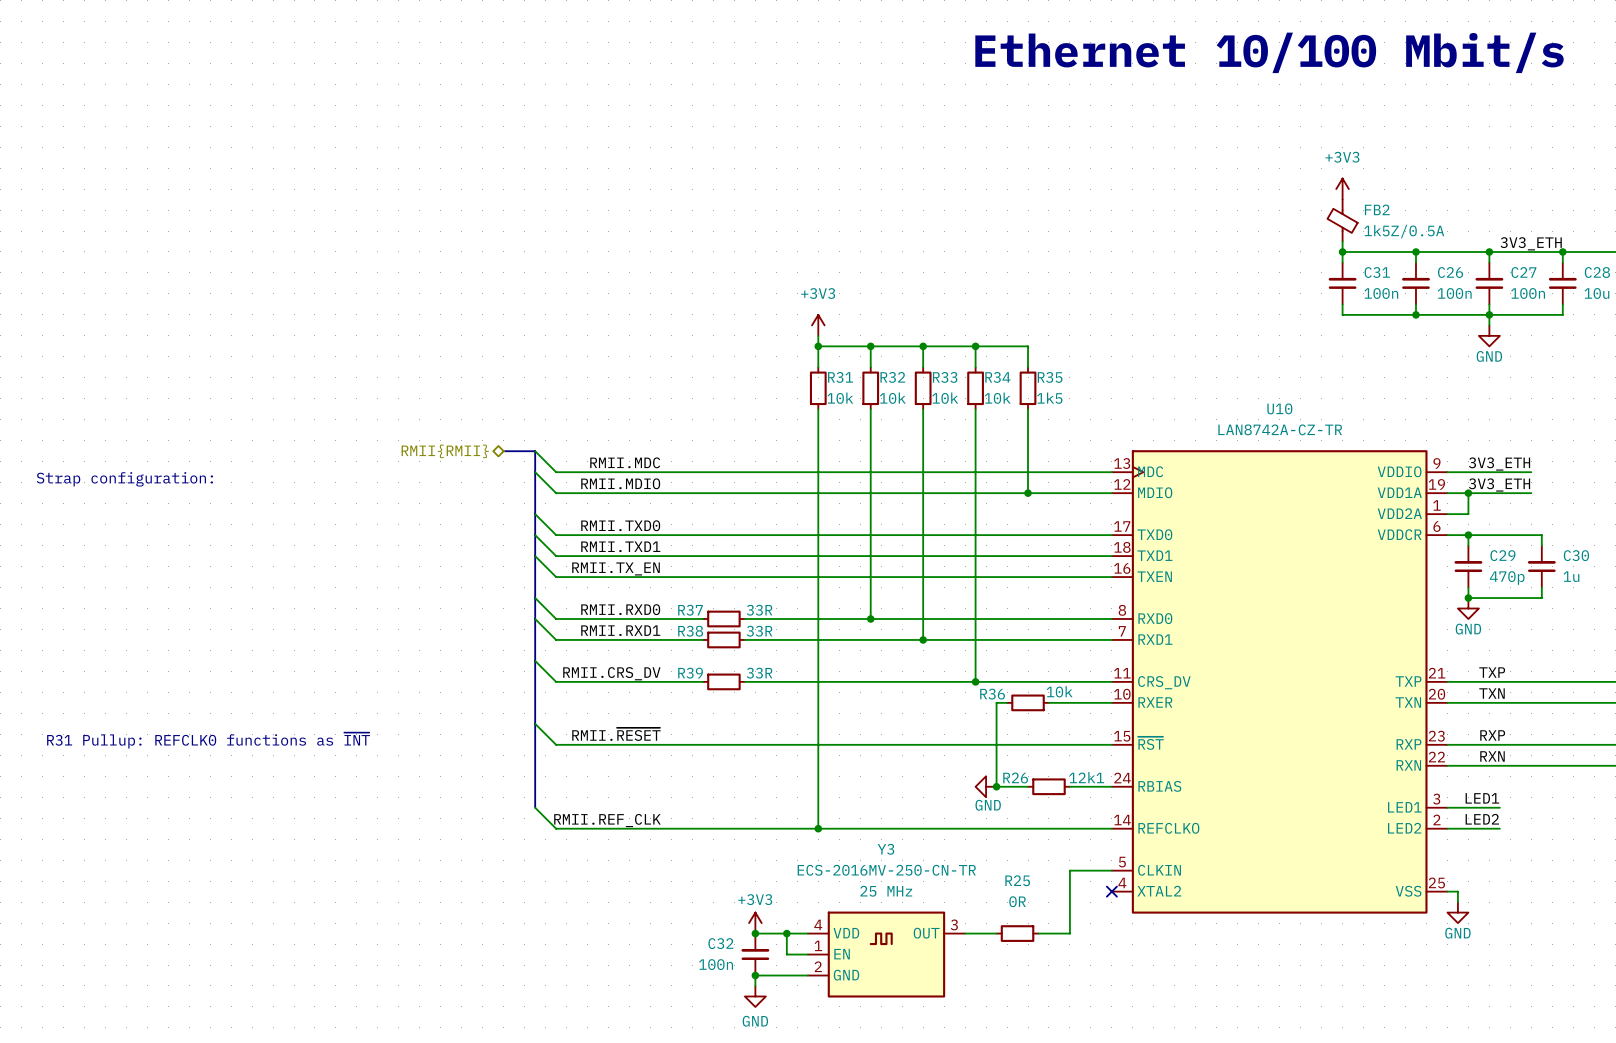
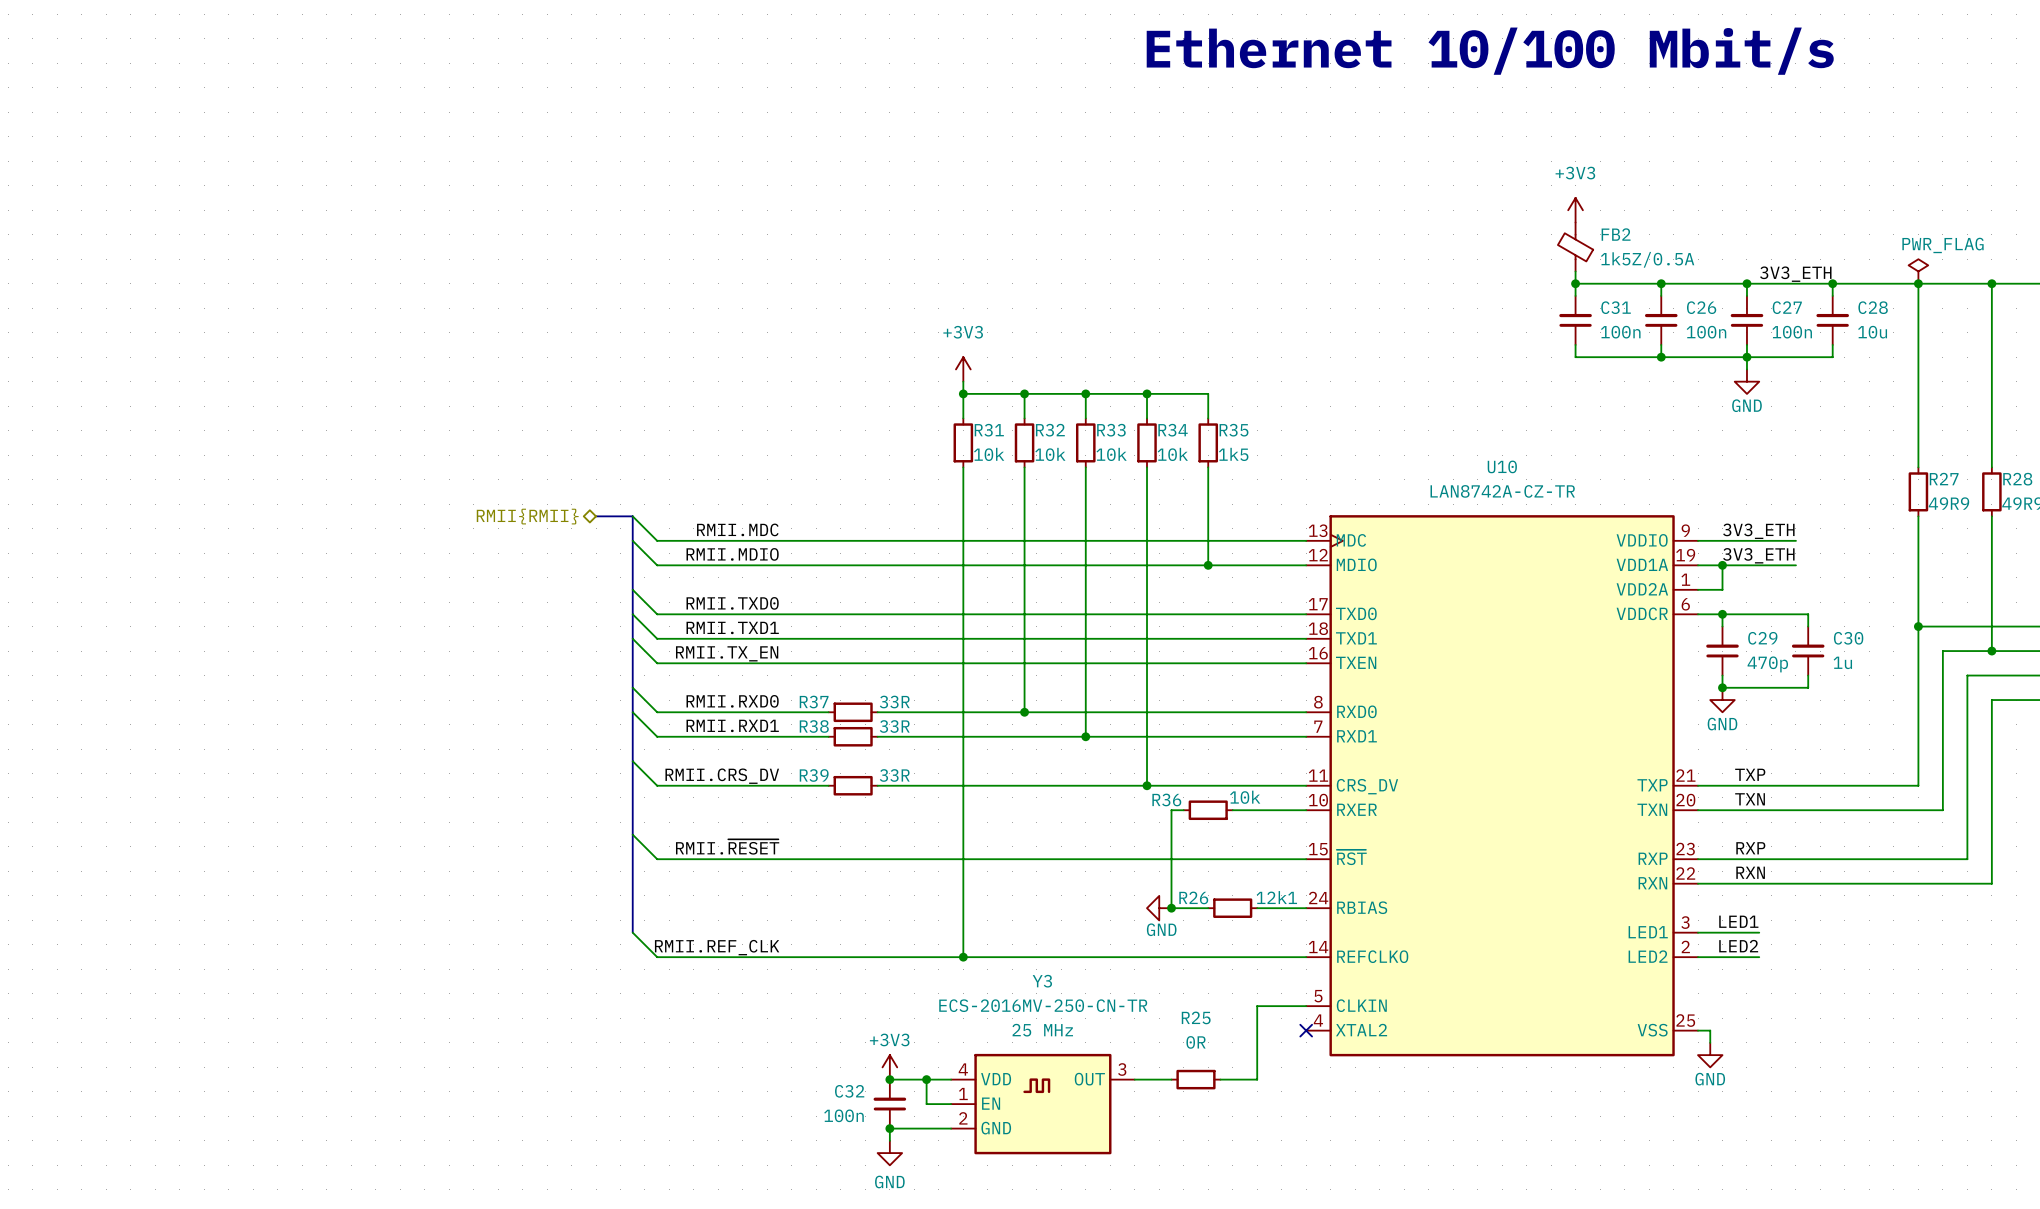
text: Strap configuration: (124, 479) -> none
text: R31 Pullup: REFCLK0 functions as ~{INT} (208, 740) -> none

